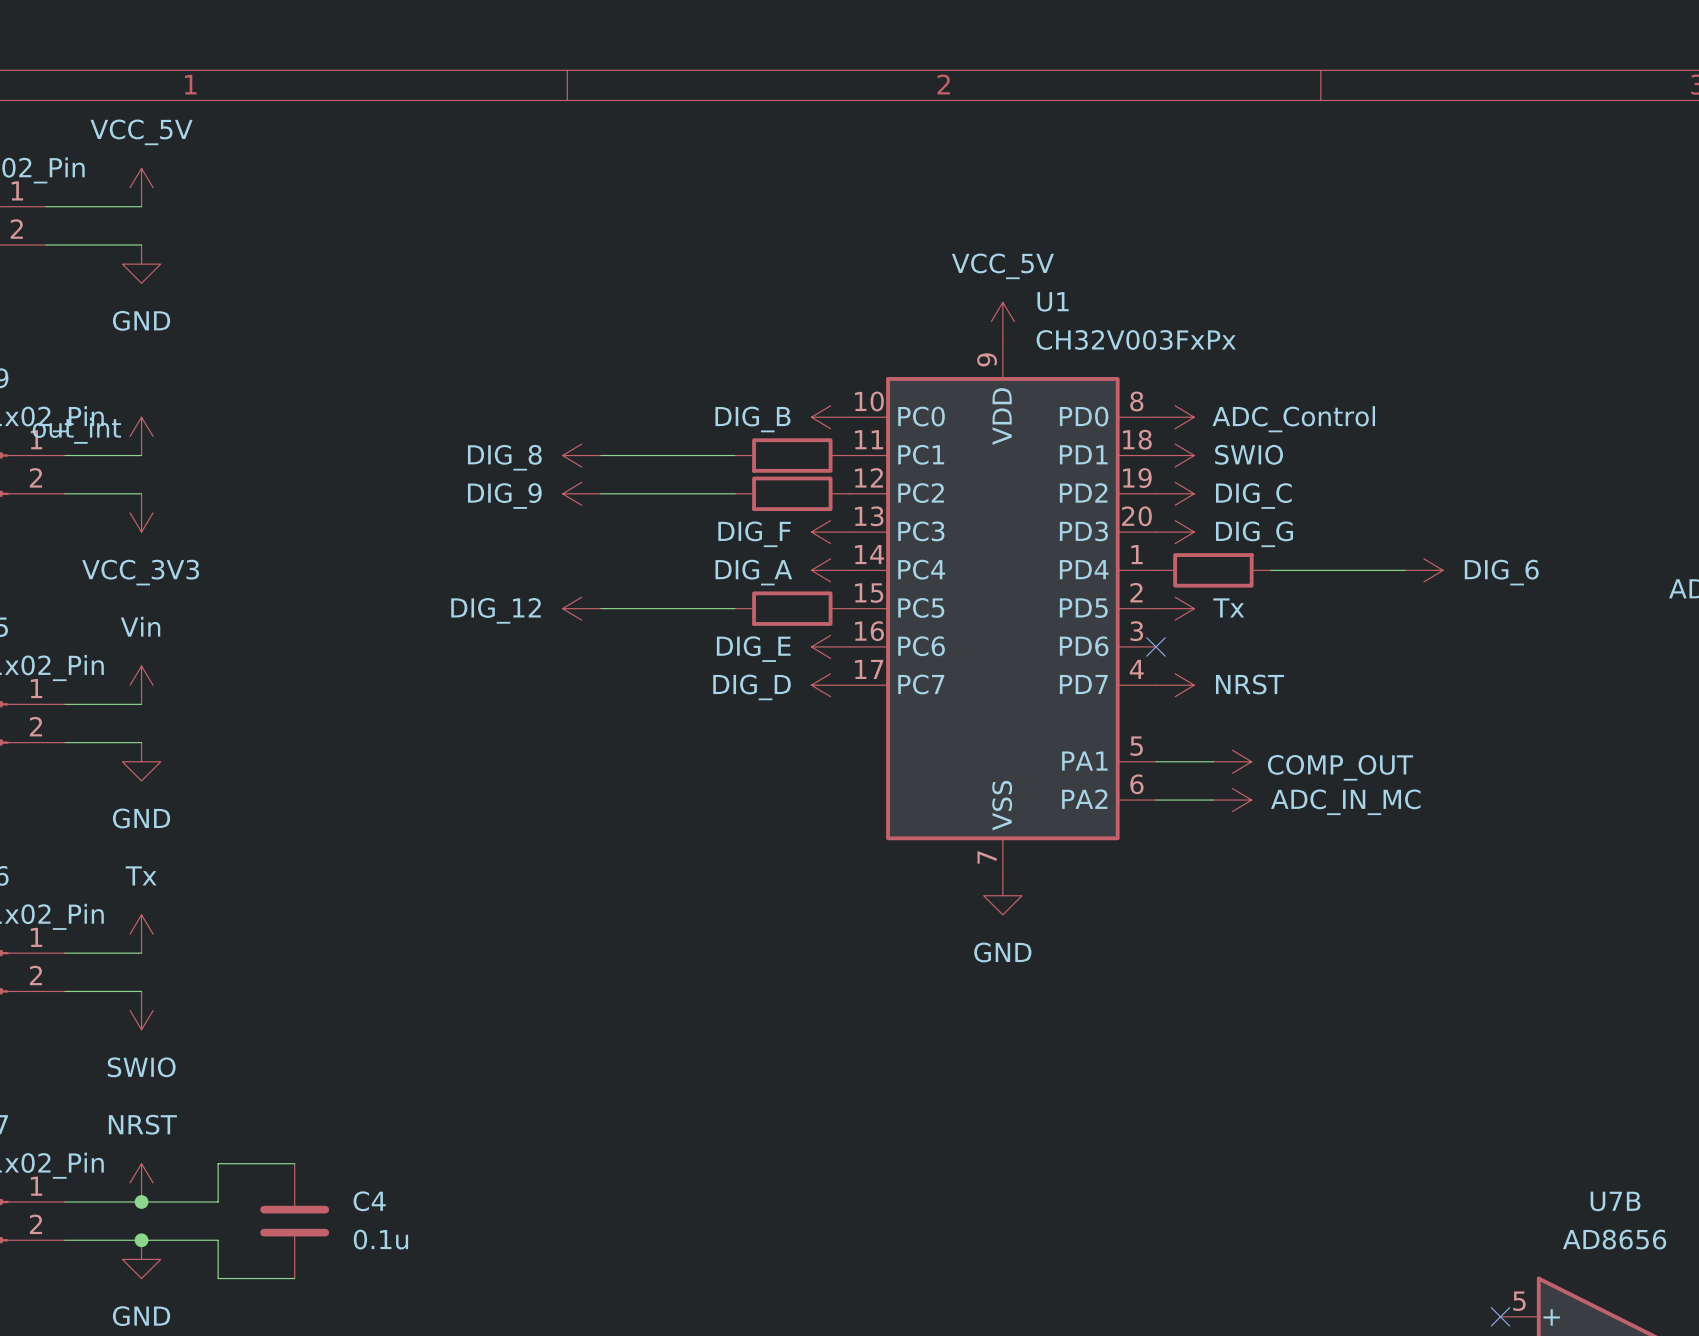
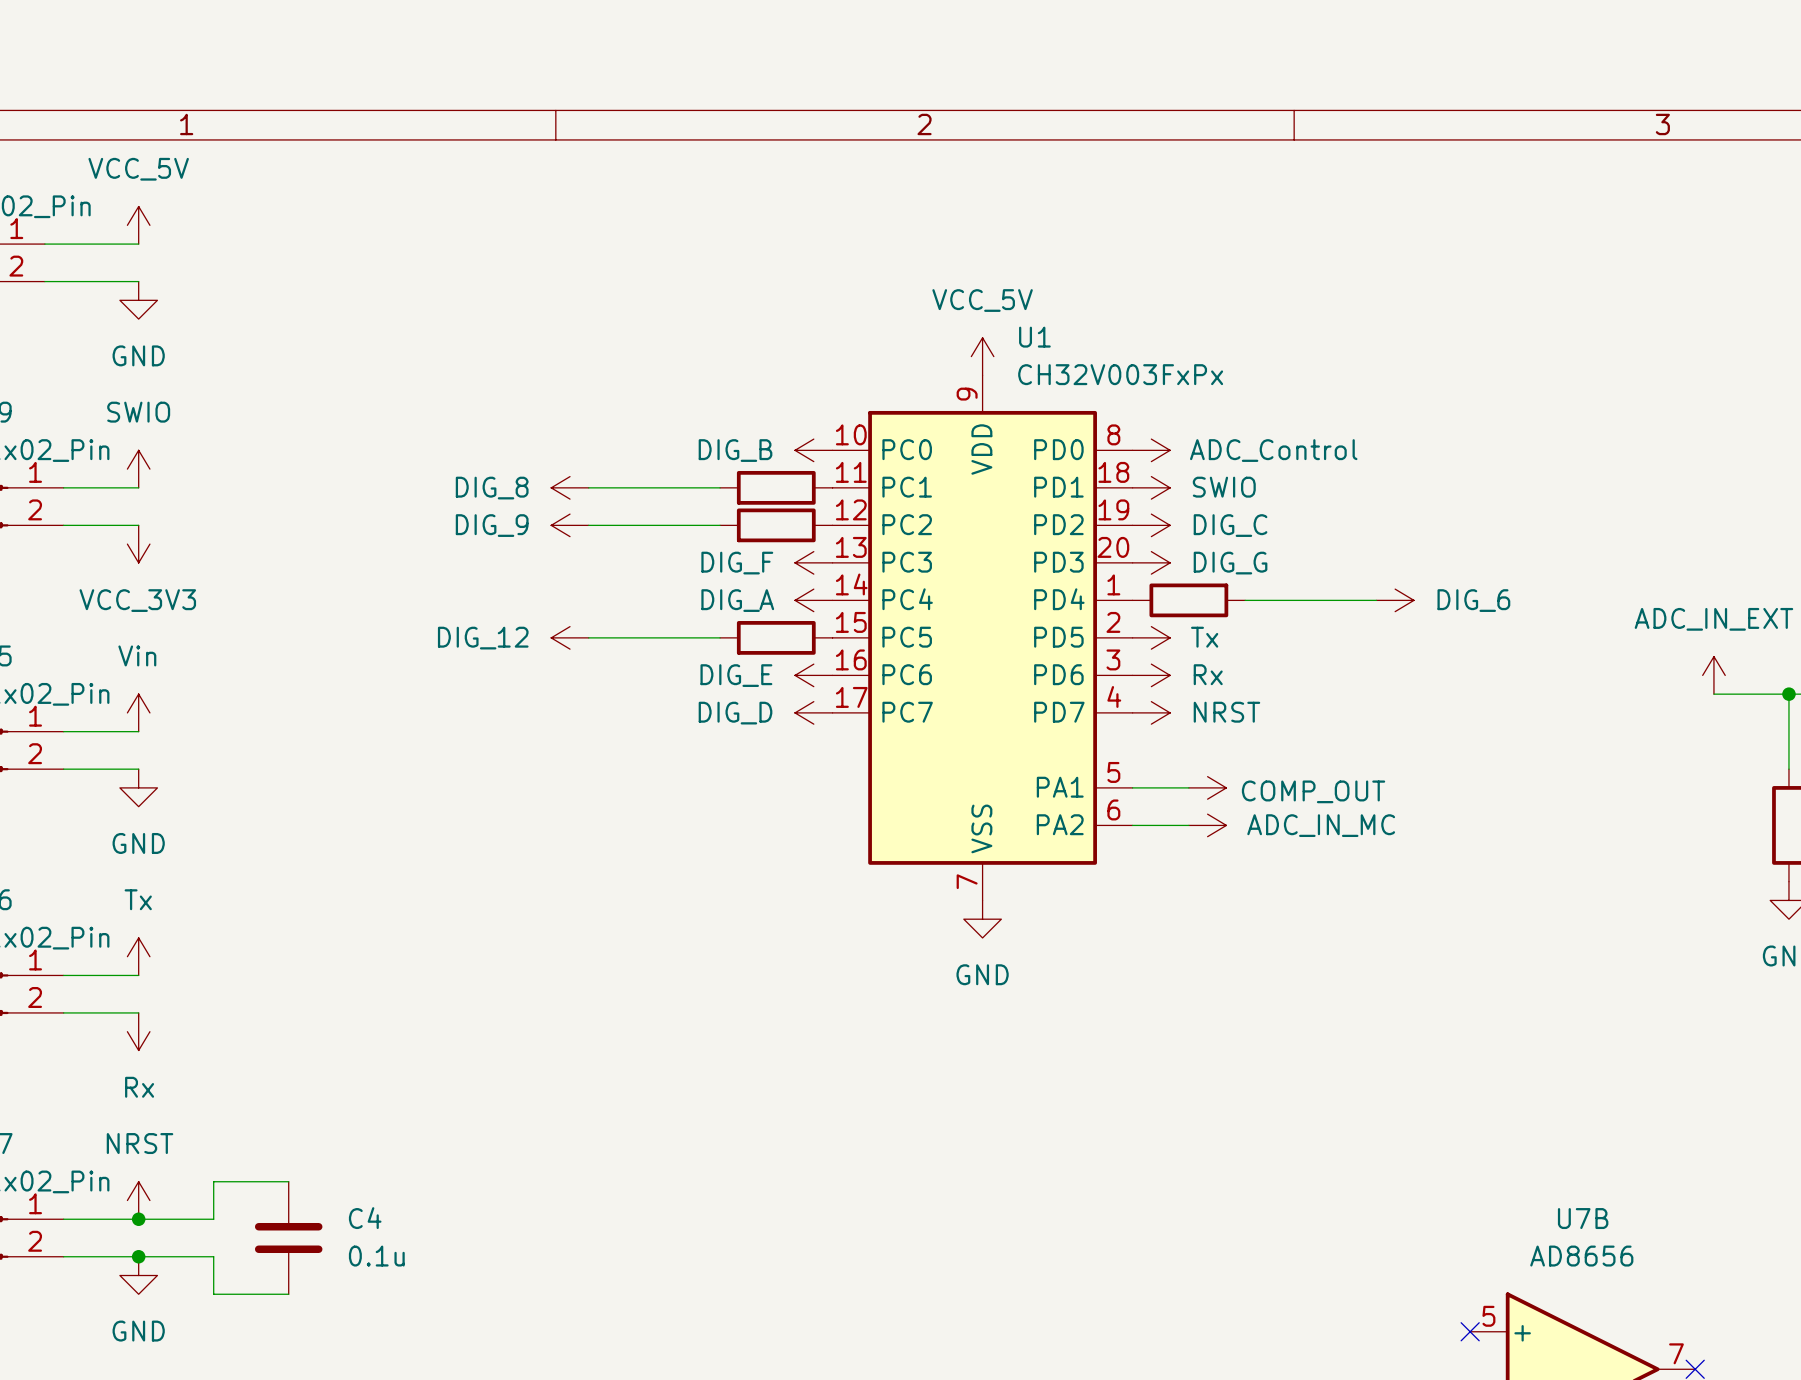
power symbol: out_int (141, 436) -> SWIO (138, 469)
no-connect mark: (1155, 646) -> none
power symbol: none -> Rx (1151, 675)
power symbol: SWIO (141, 1010) -> Rx (138, 1031)

